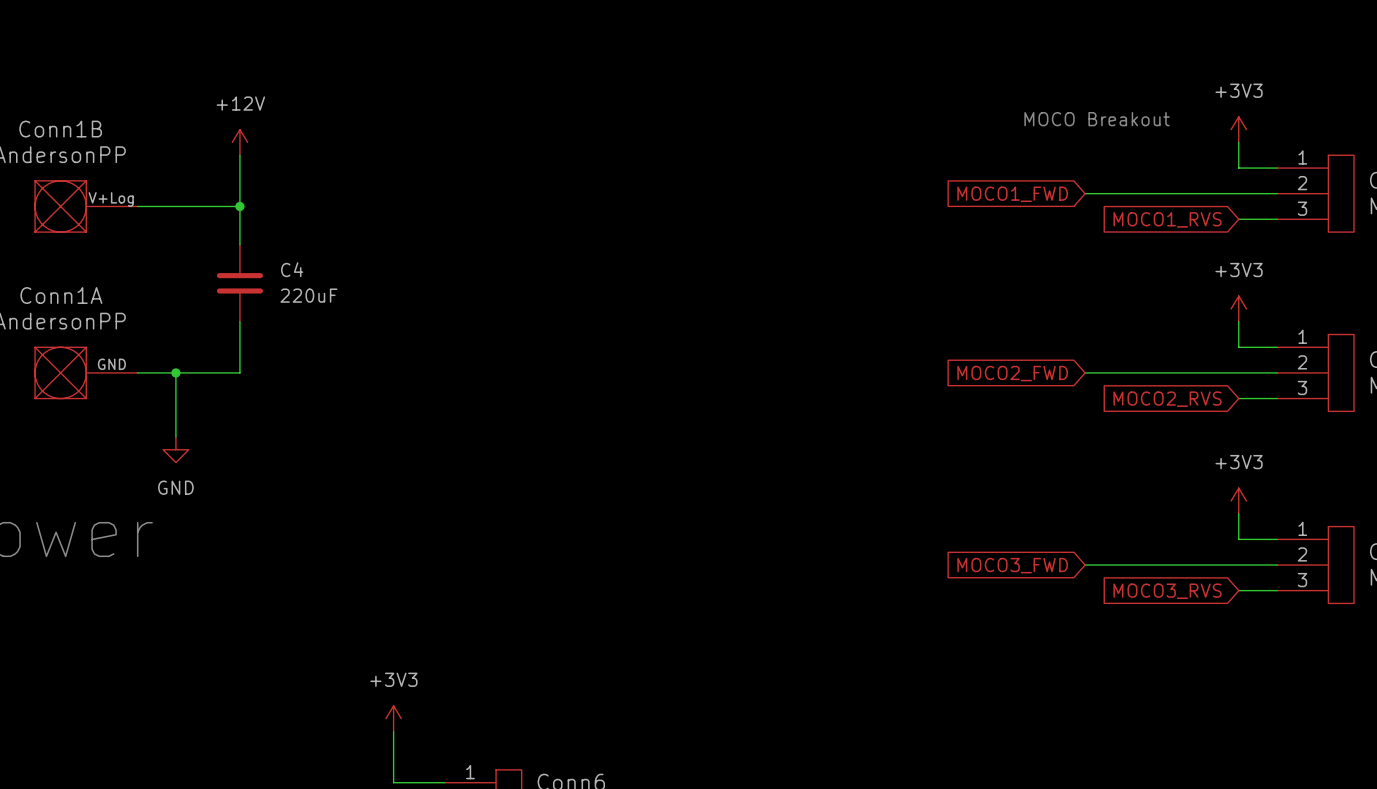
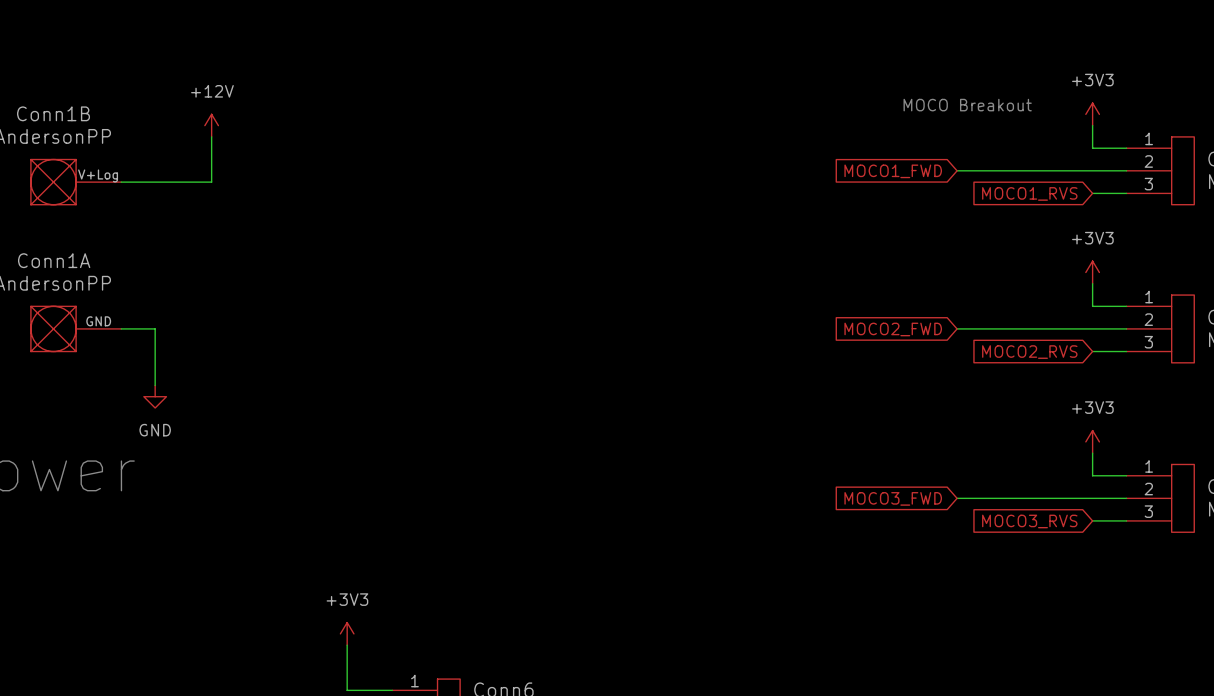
wire: (239, 206) (239, 244) -> none
junction: (239, 206) -> none
C4: 220uF (239, 283) -> none
wire: (239, 321) (239, 372) (175, 372) -> none
junction: (175, 372) -> none

